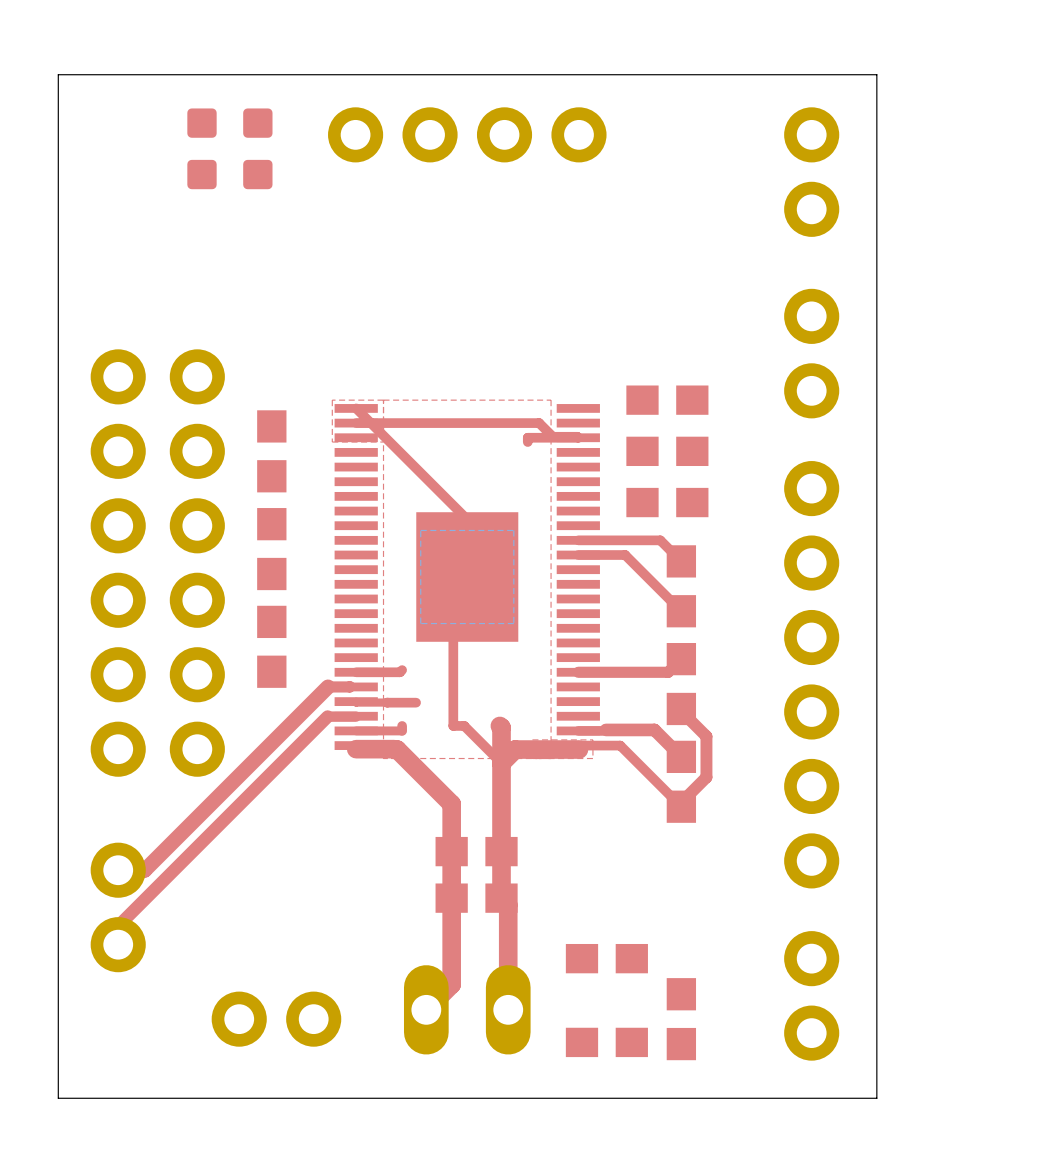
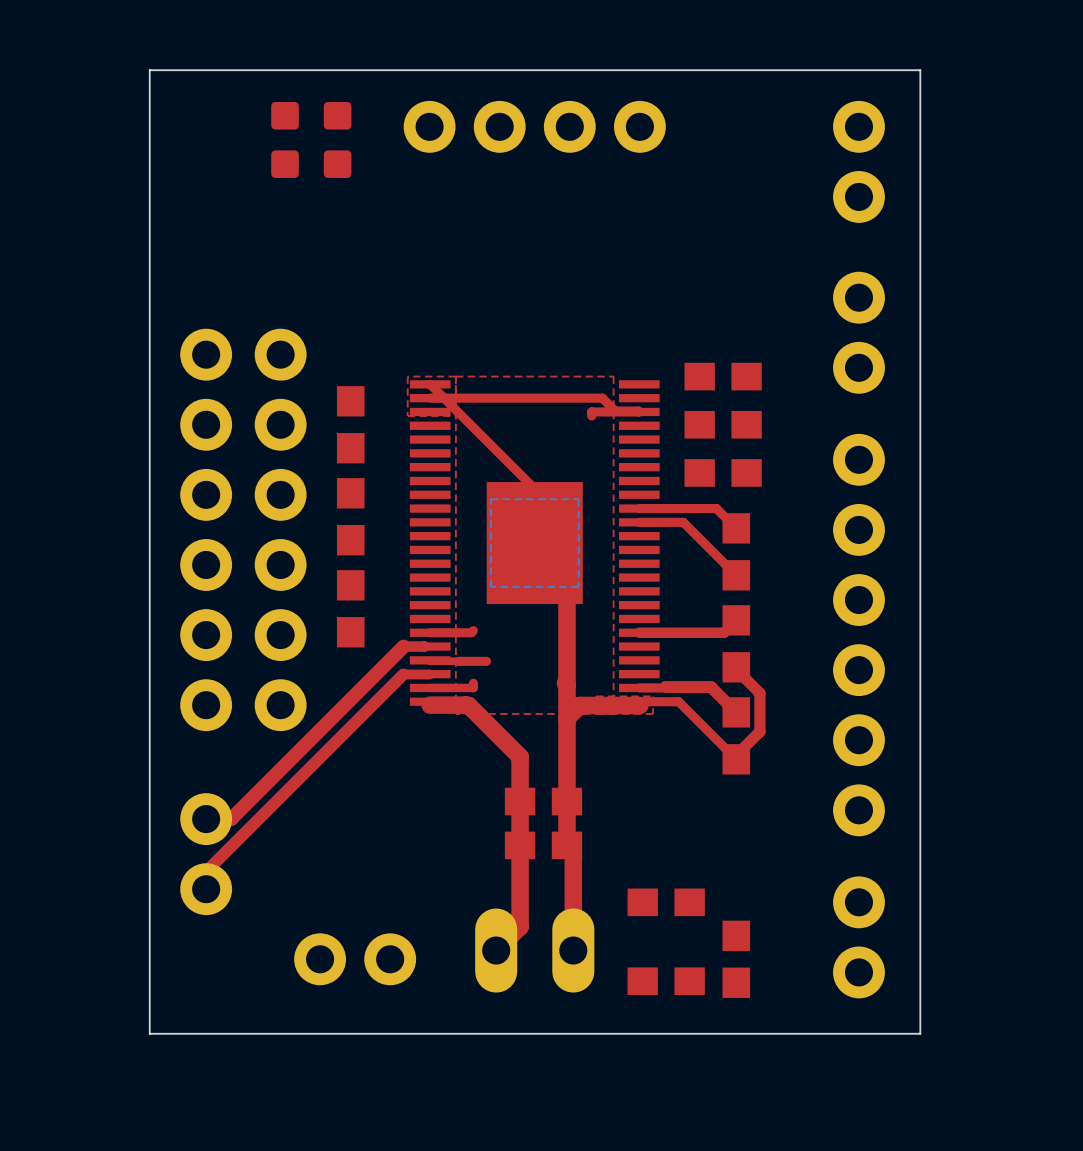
top track: (467, 572) (453, 586) (453, 725) (464, 725) (501, 763) -> none
top track: none -> (566, 575) (566, 684)

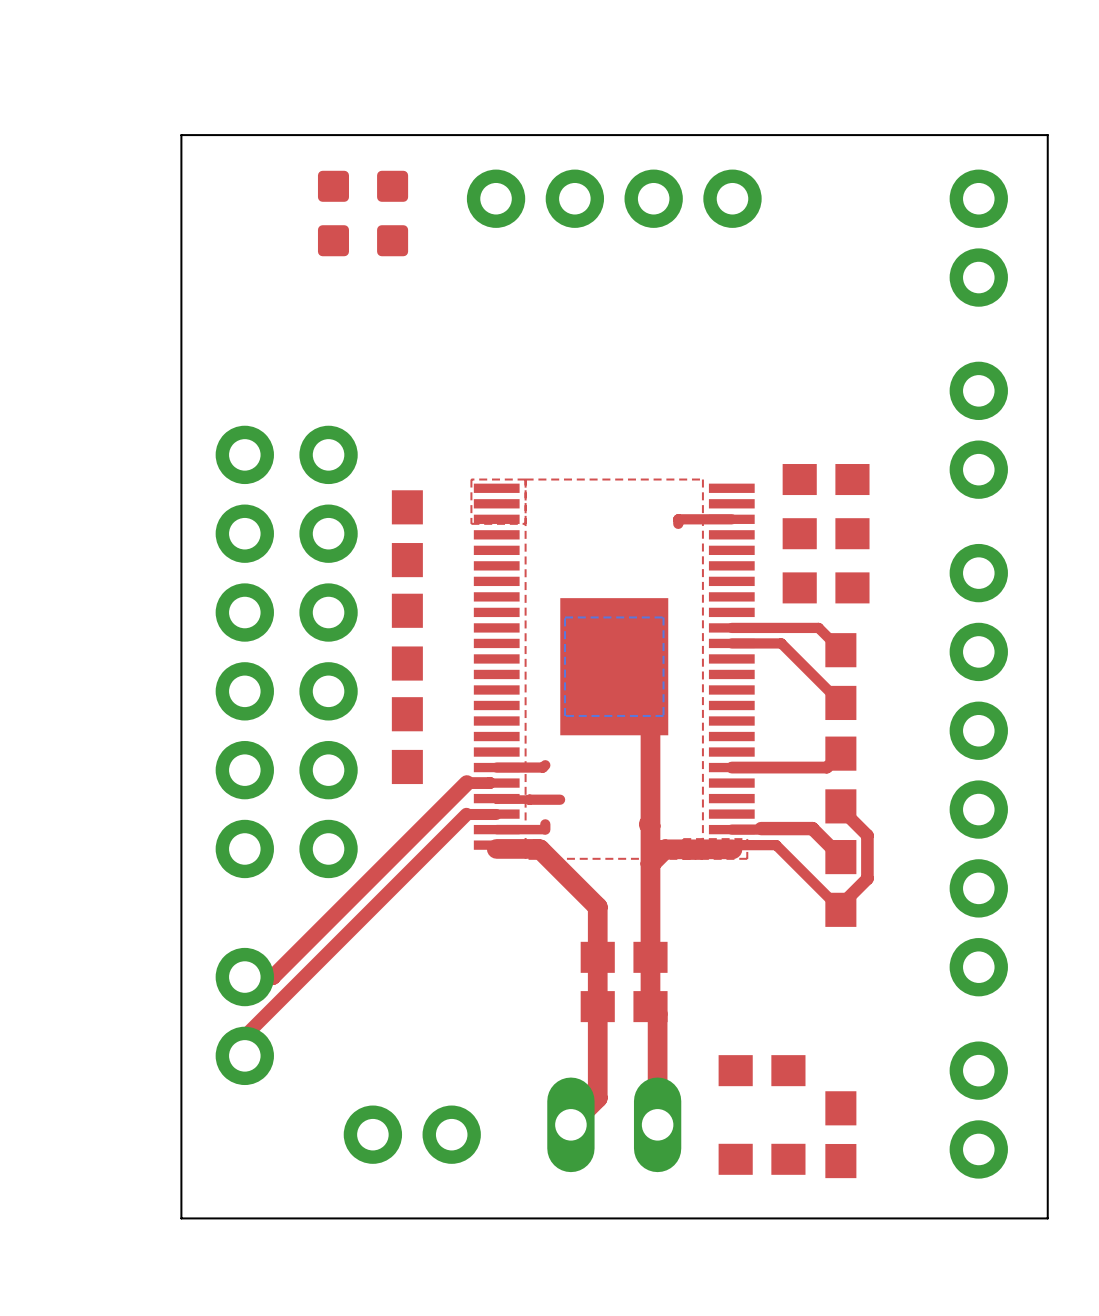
top track: (430, 384) (534, 488) (534, 543) -> none
top track: (430, 398) (602, 398) (615, 411) (639, 411) -> none

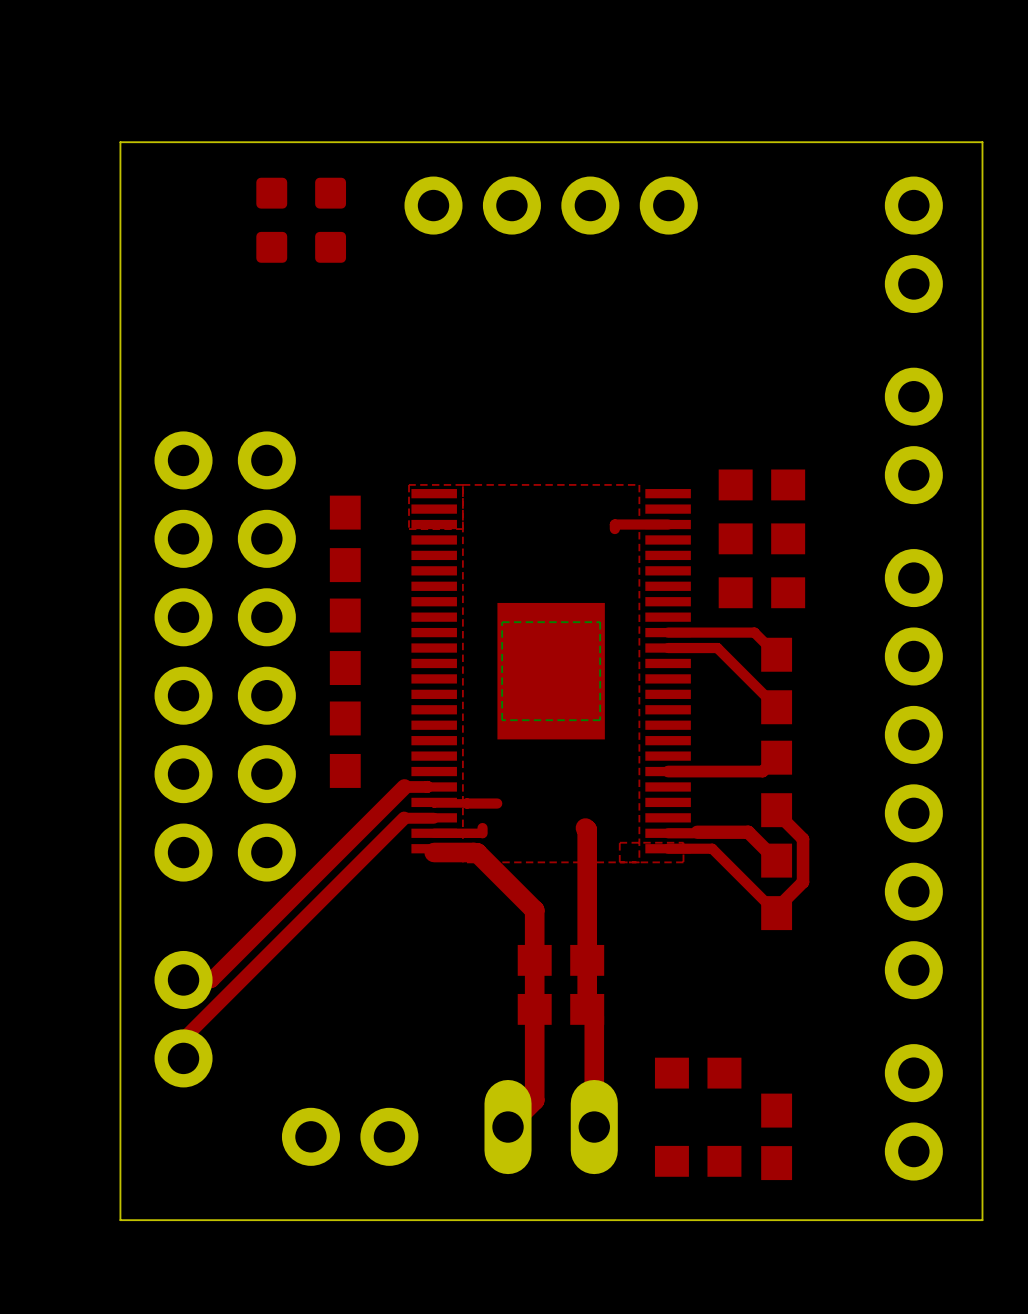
top track: (614, 666) (650, 702) (650, 826) -> none
top track: (545, 765) (542, 767) (496, 767) -> none
top track: (732, 849) (664, 849) (650, 863) -> none

